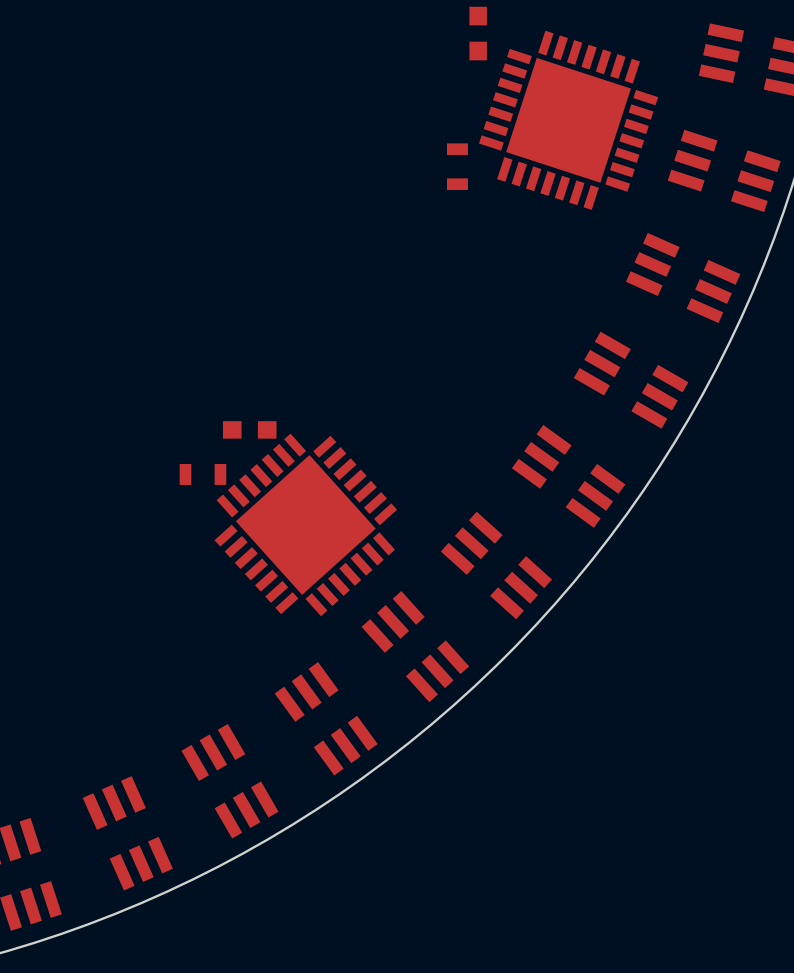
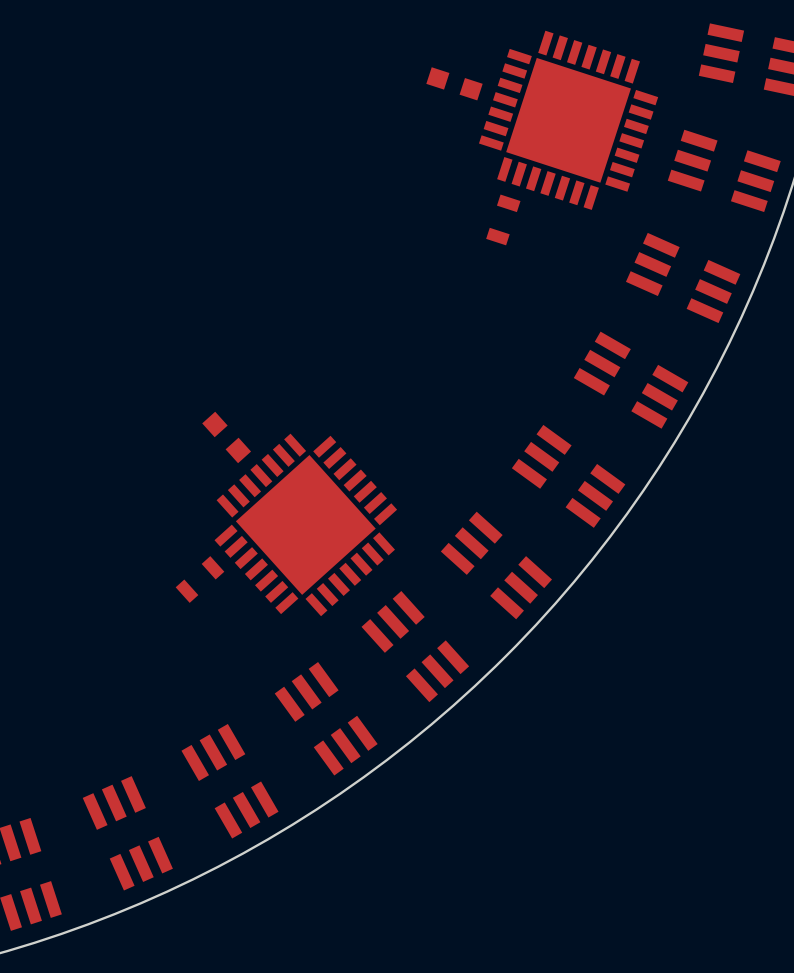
part: (478, 33) -> none
part: none -> (454, 83)
part: (457, 166) -> none
part: none -> (503, 219)
part: (249, 429) -> none
part: none -> (226, 437)
part: (202, 474) -> none
part: none -> (200, 579)

